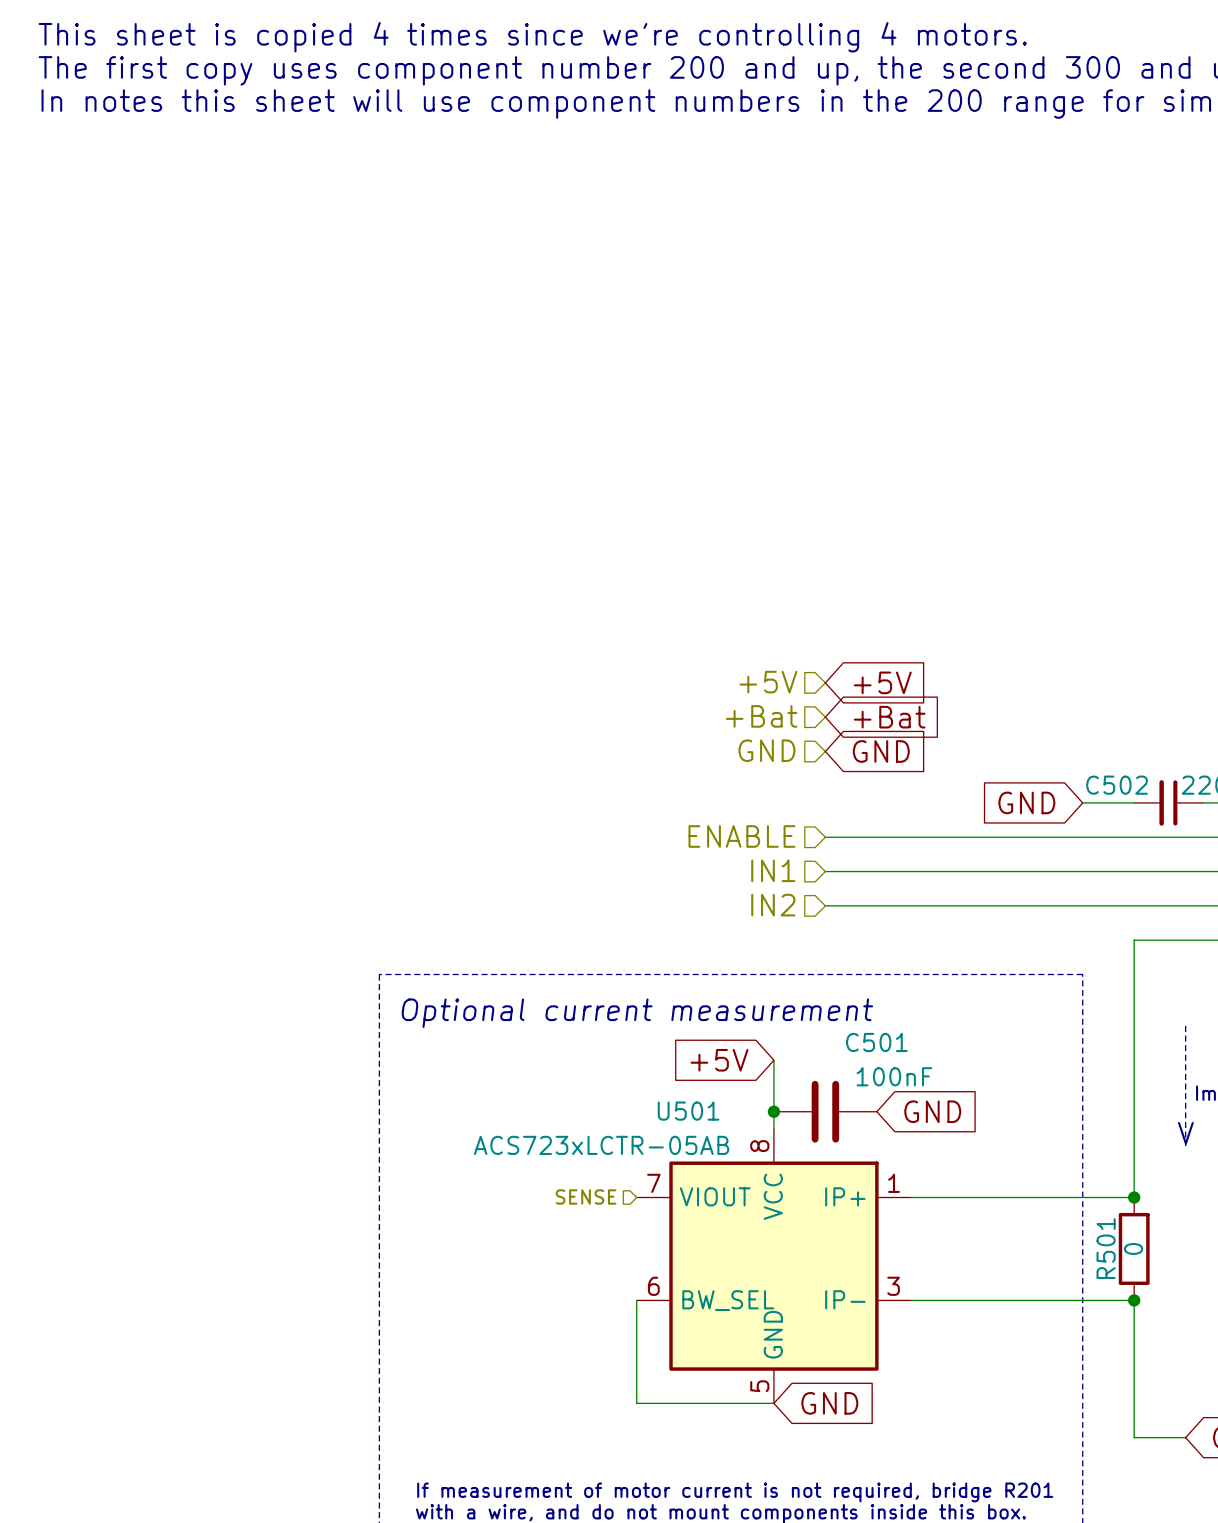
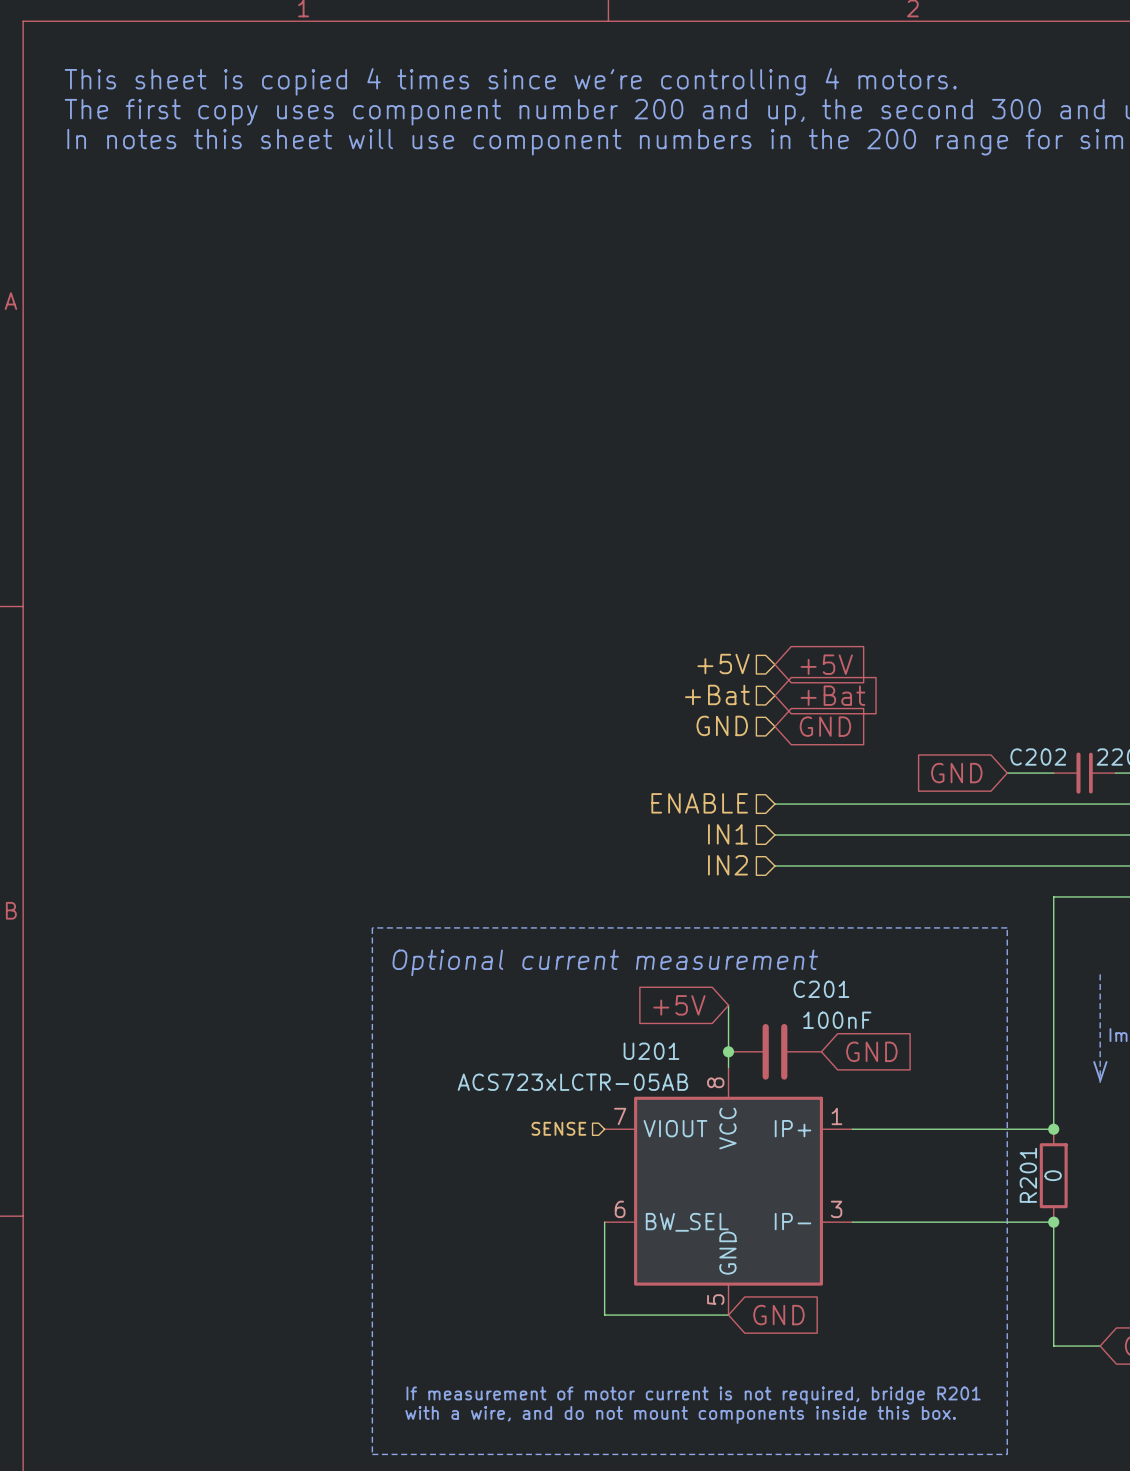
C502 name: C502 (1117, 785) -> C202 (1038, 757)
C501 name: C501 (876, 1042) -> C201 (821, 989)
U501 name: U501 (688, 1111) -> U201 (651, 1051)
R501 name: R501 (1106, 1248) -> R201 (1028, 1175)

